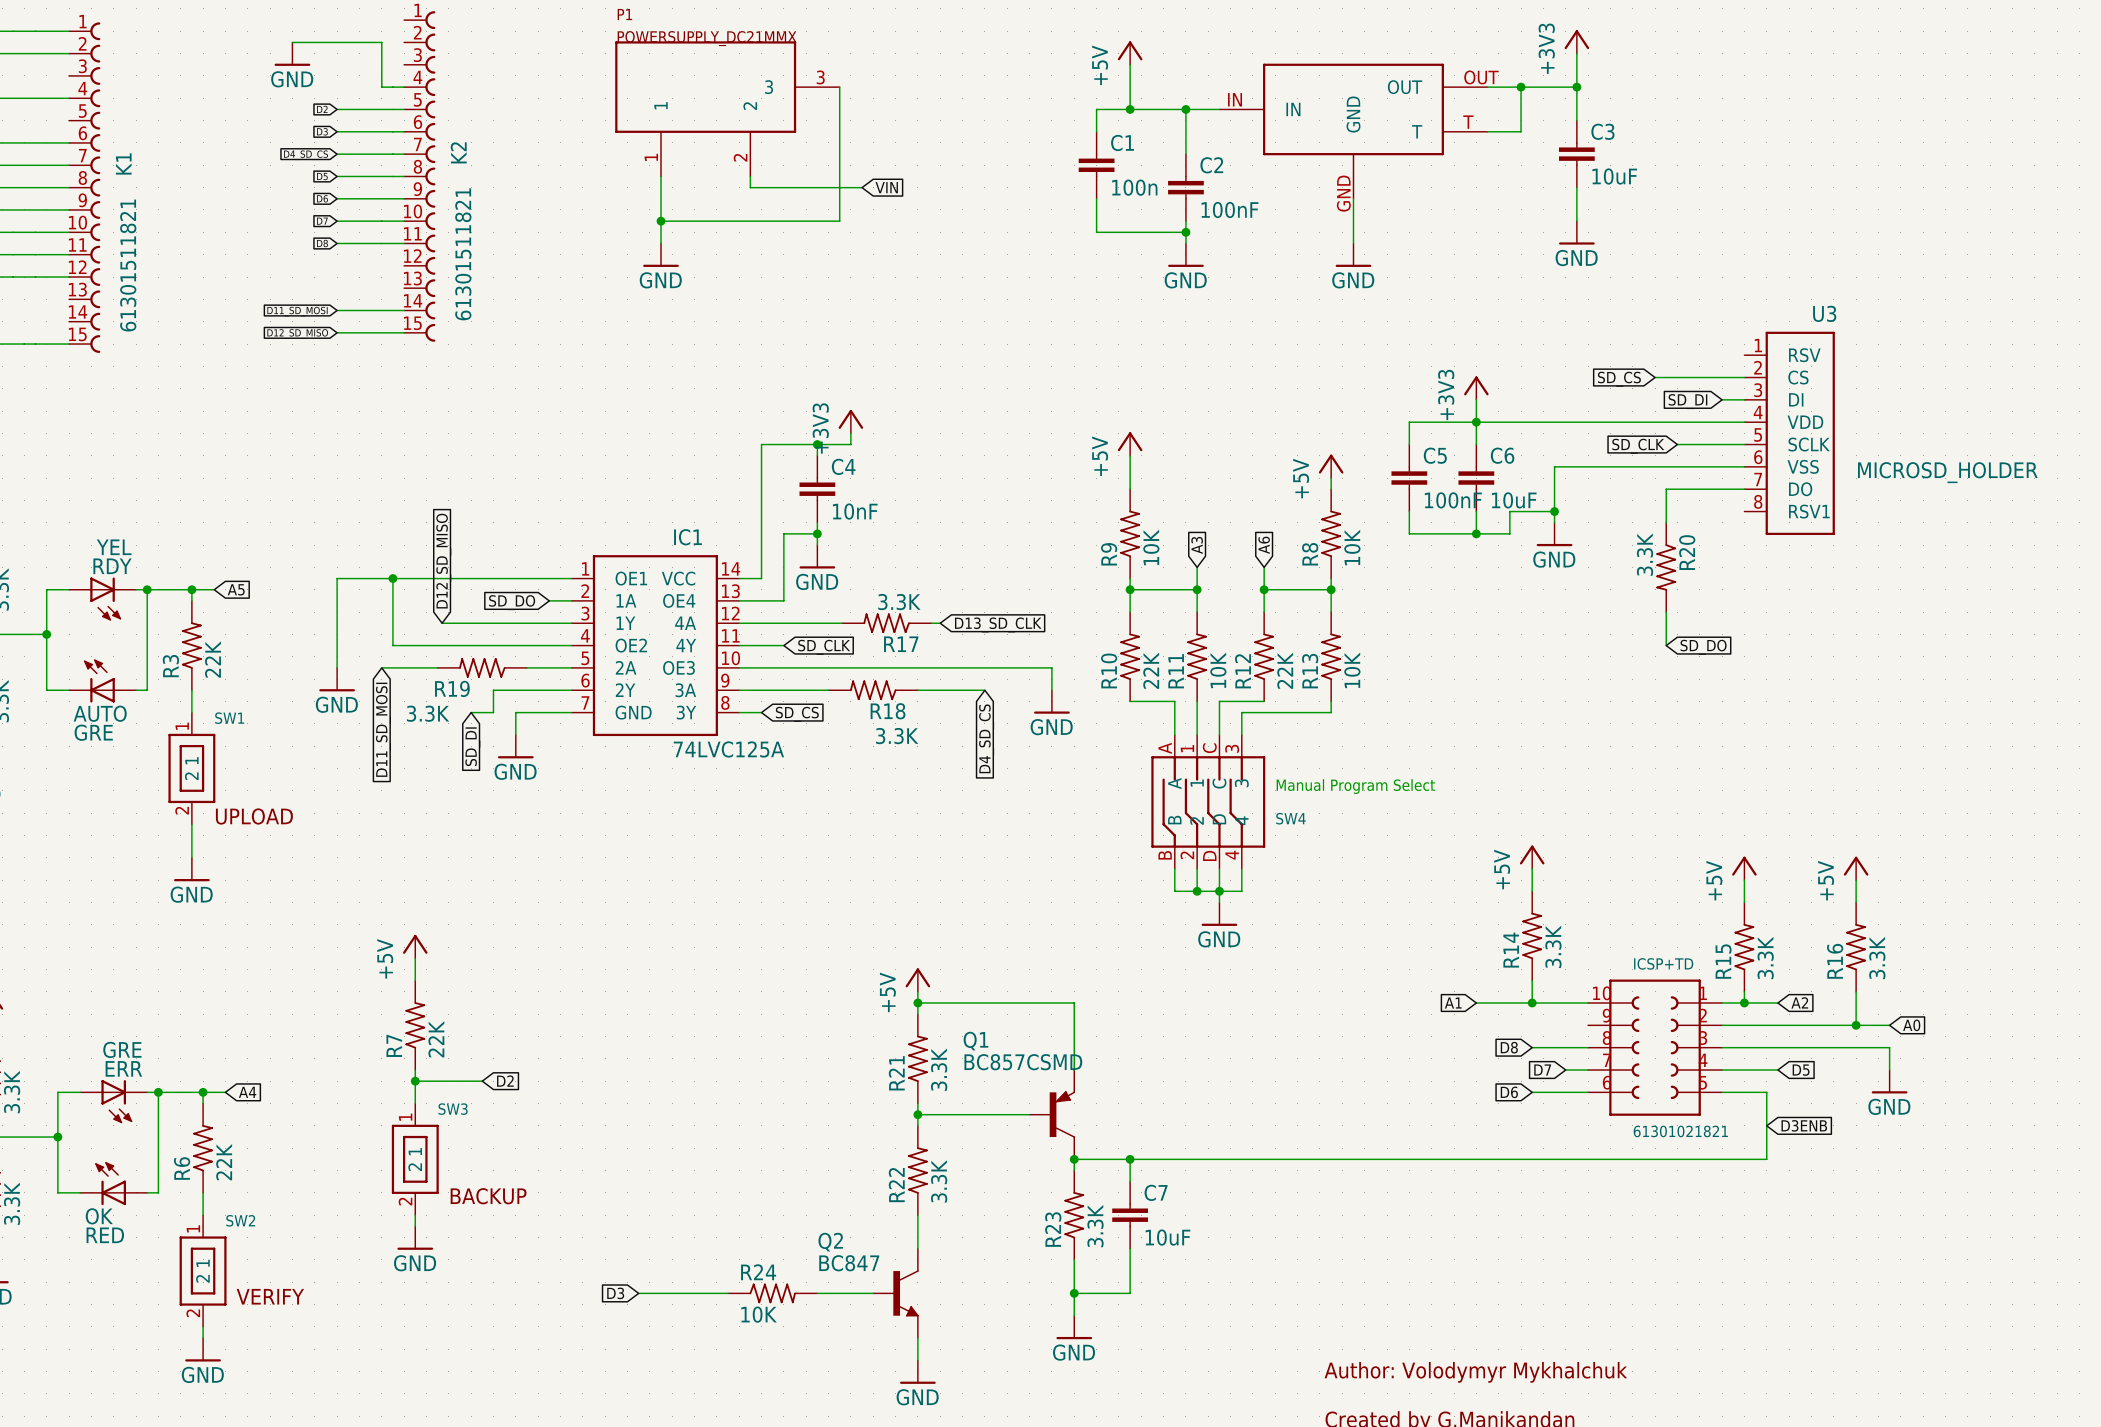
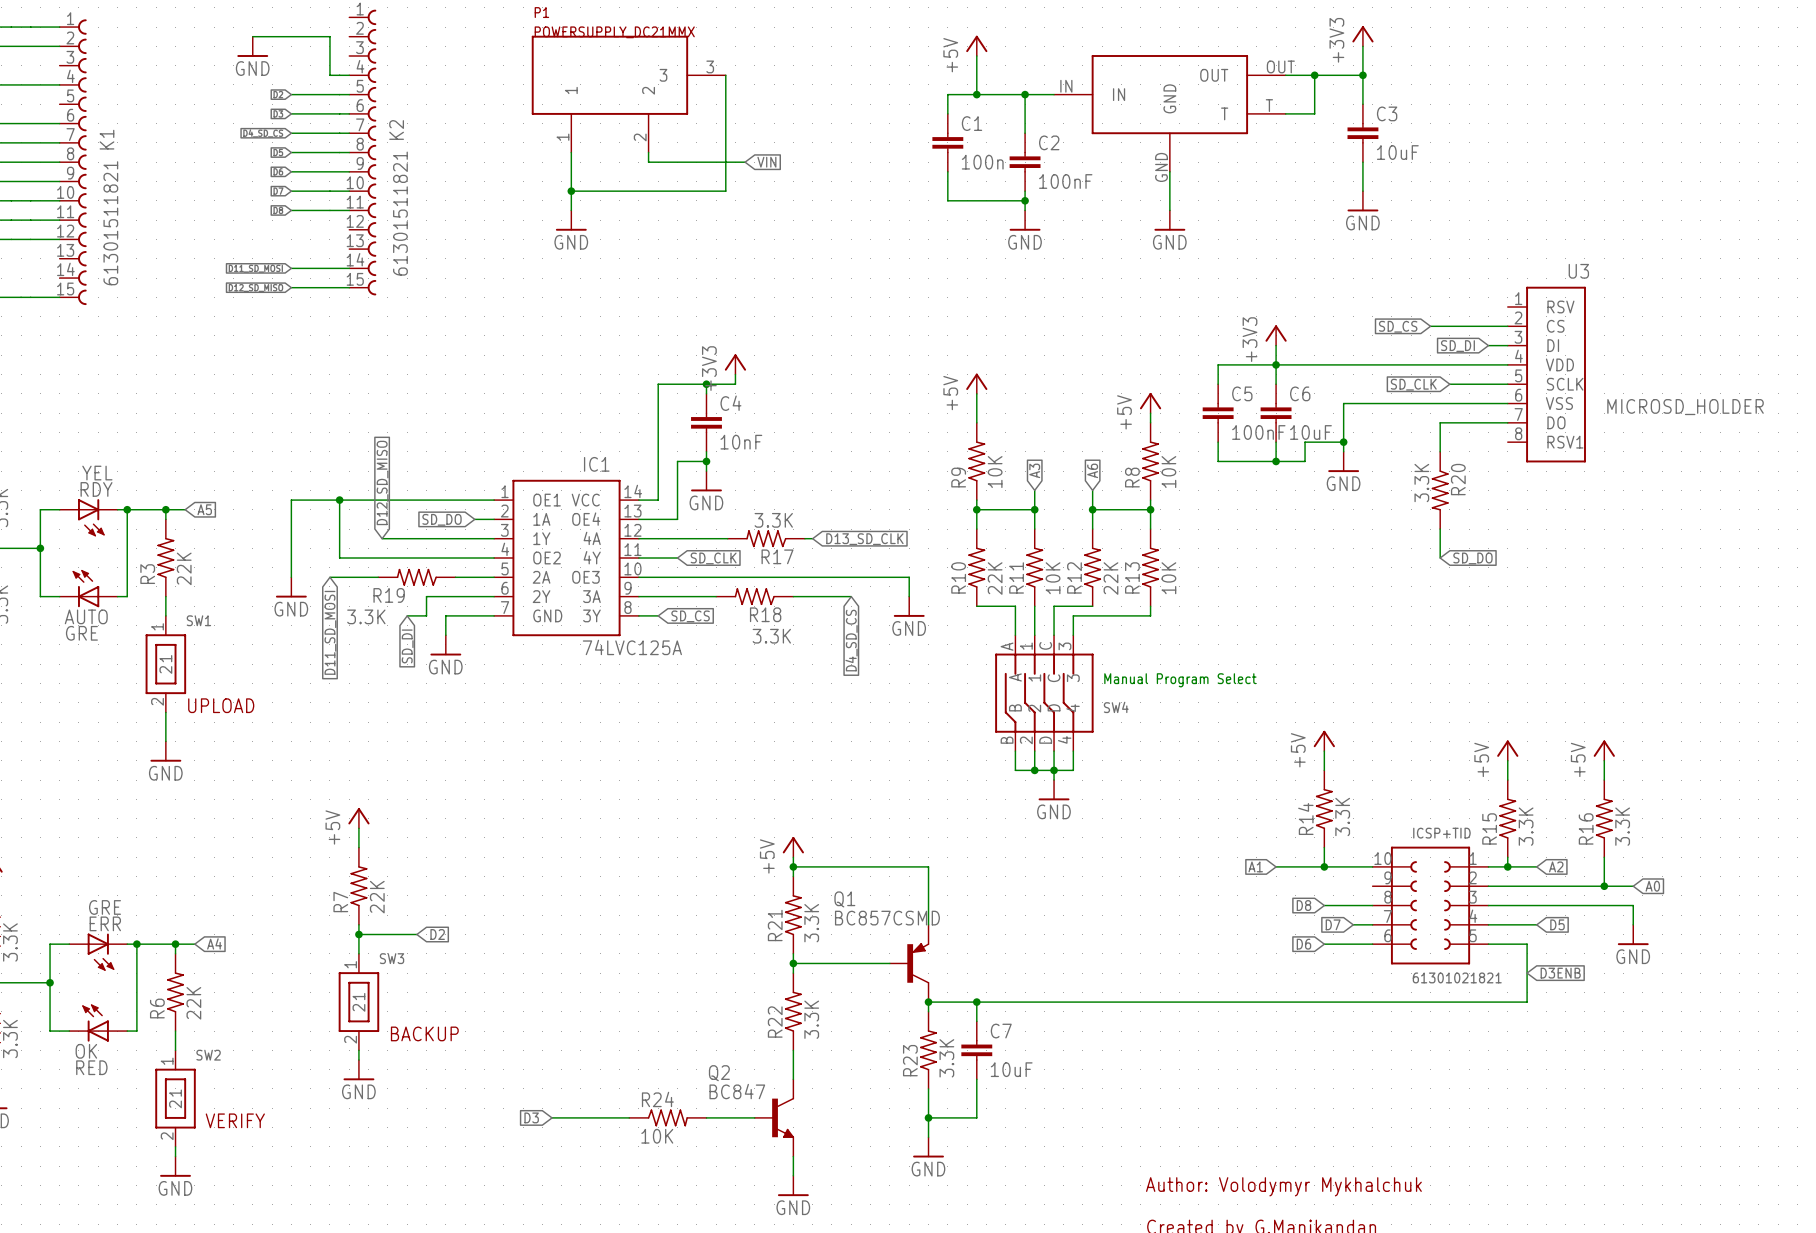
ICSP+TD name: ICSP+TD (1663, 963) -> ICSP+TID (1441, 833)

